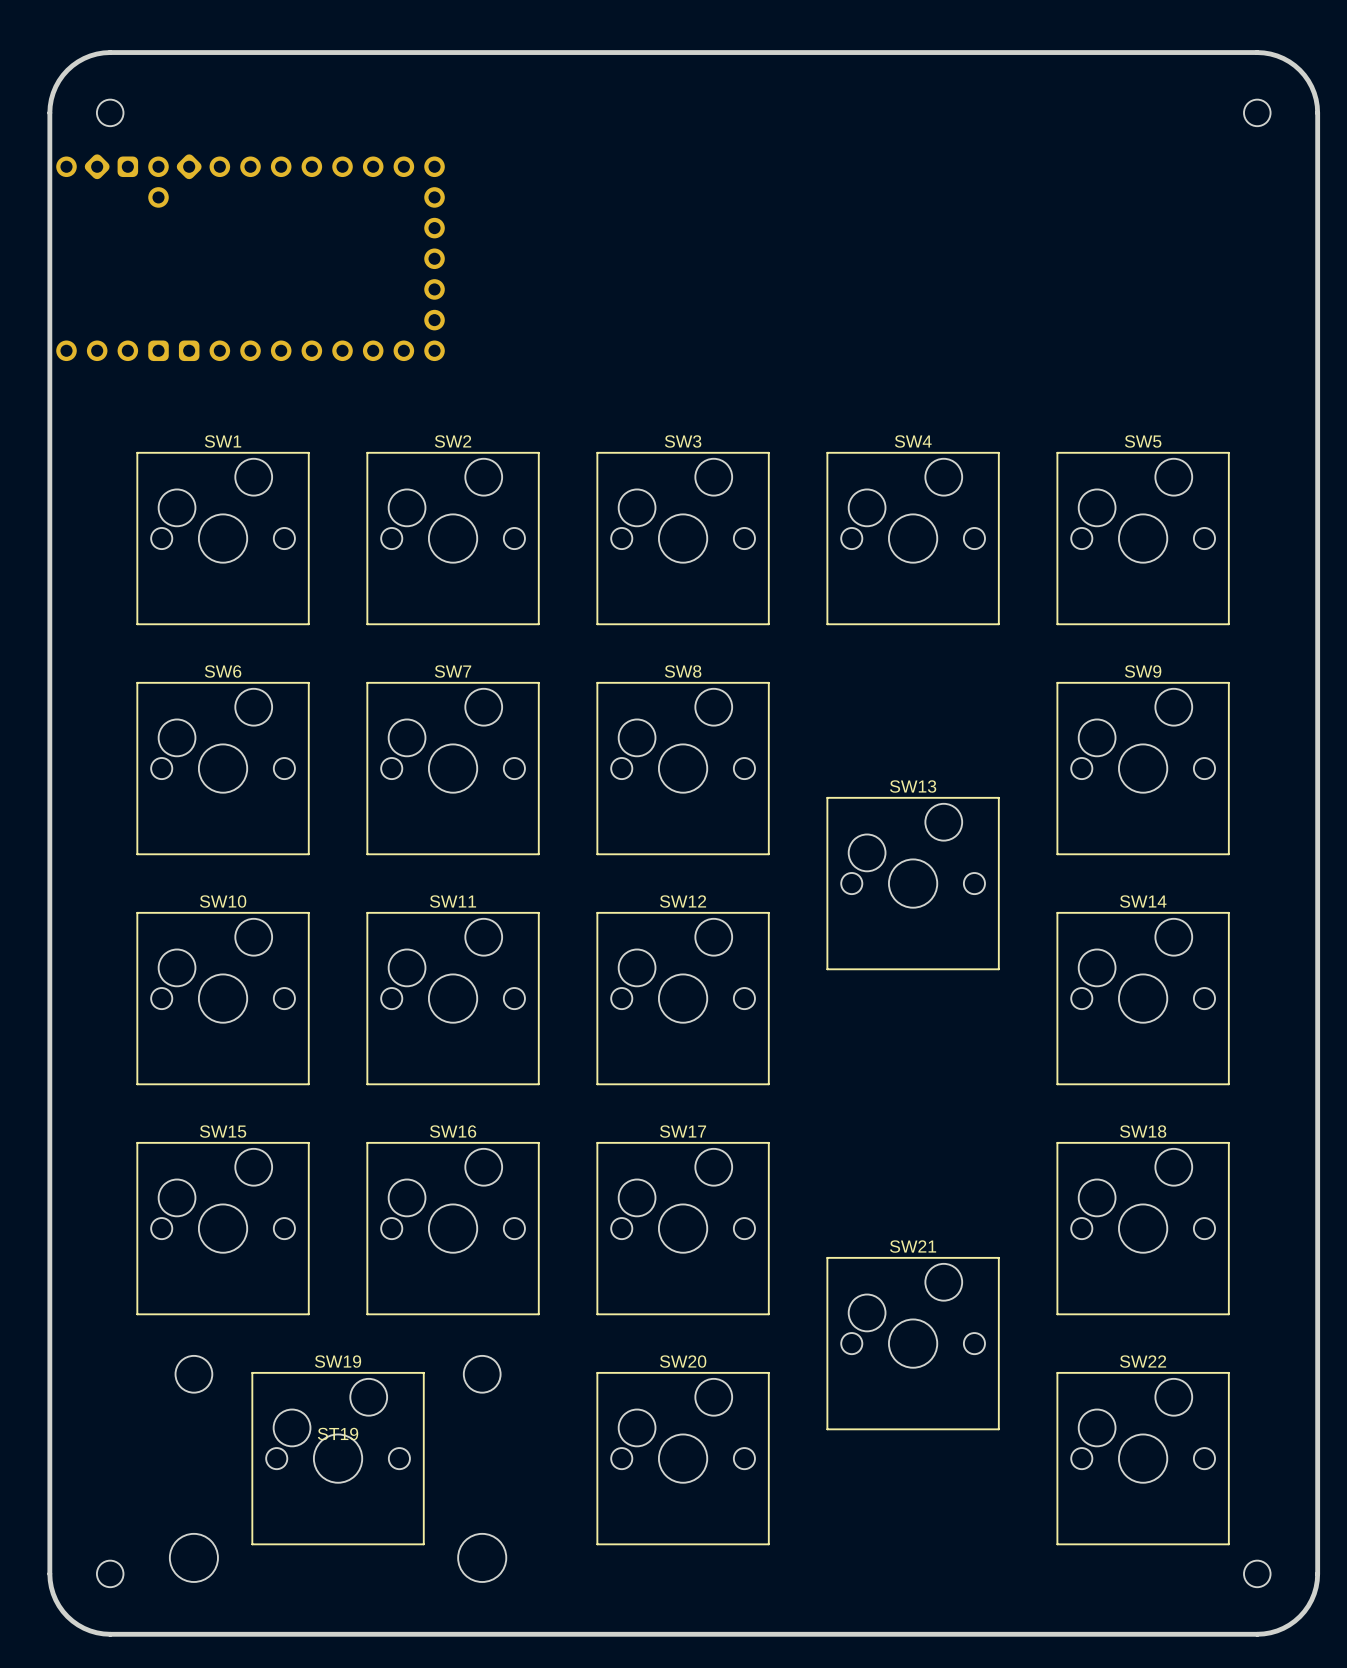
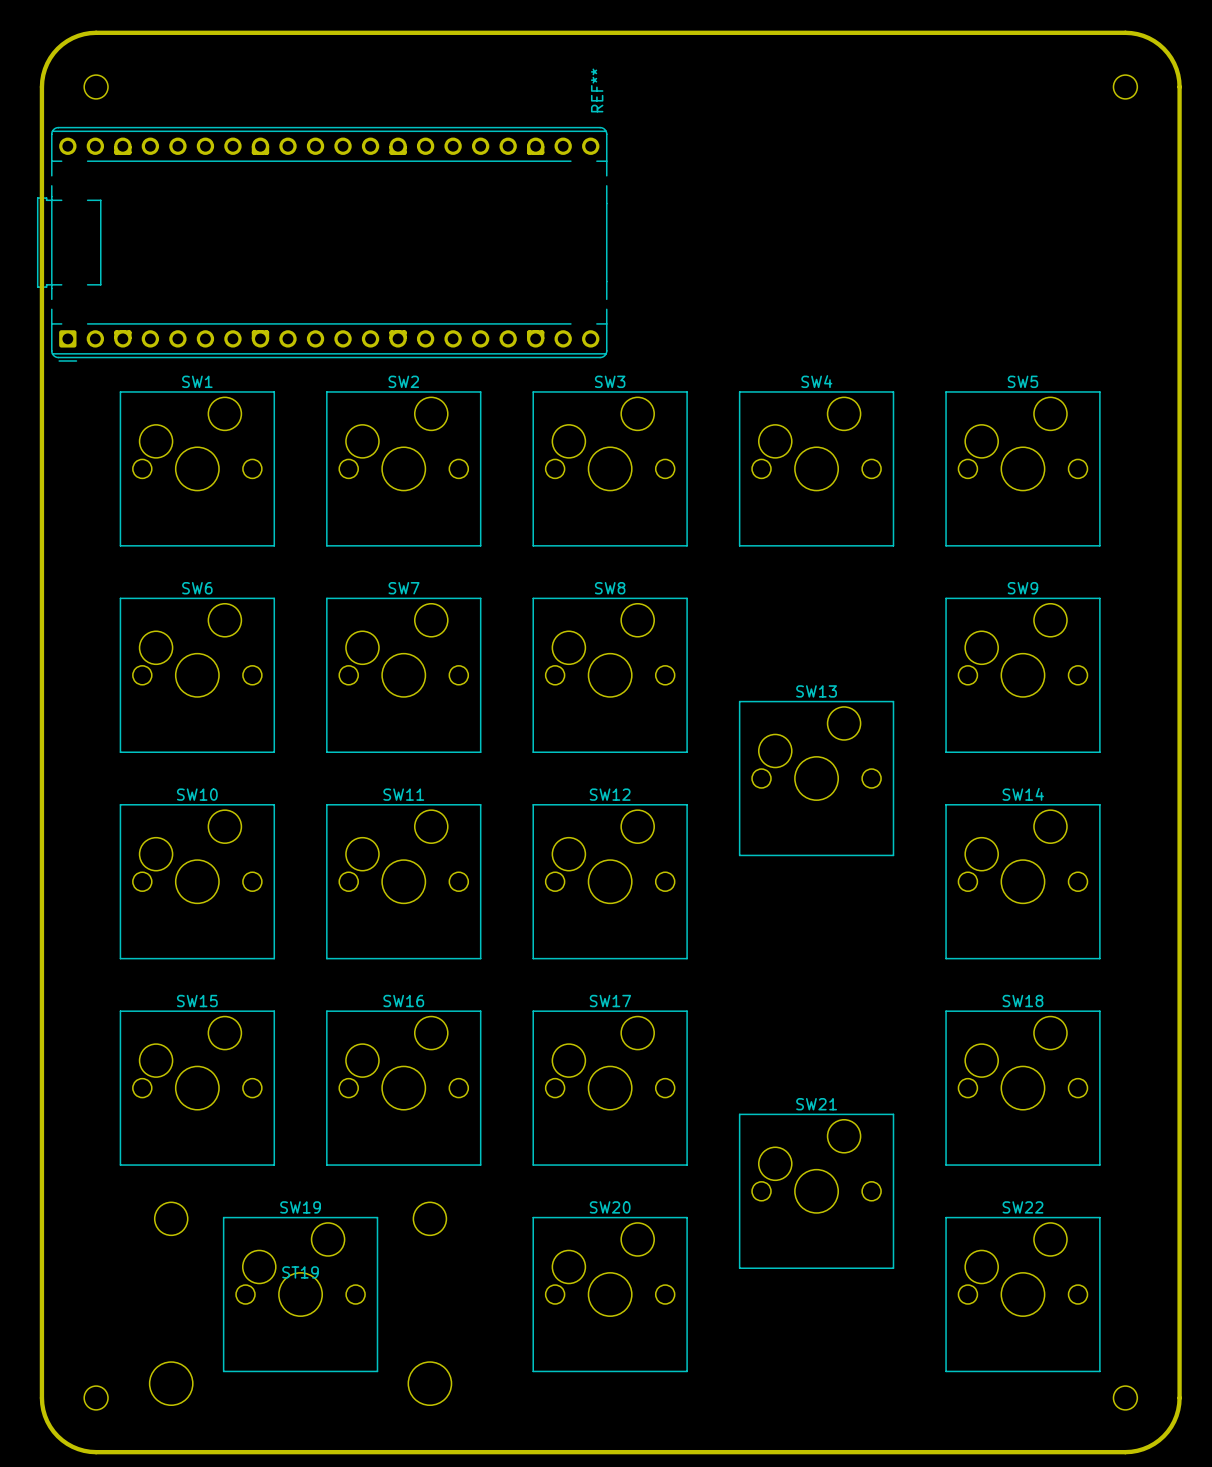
part: (250, 257) -> none
REF**: none -> (322, 244)

